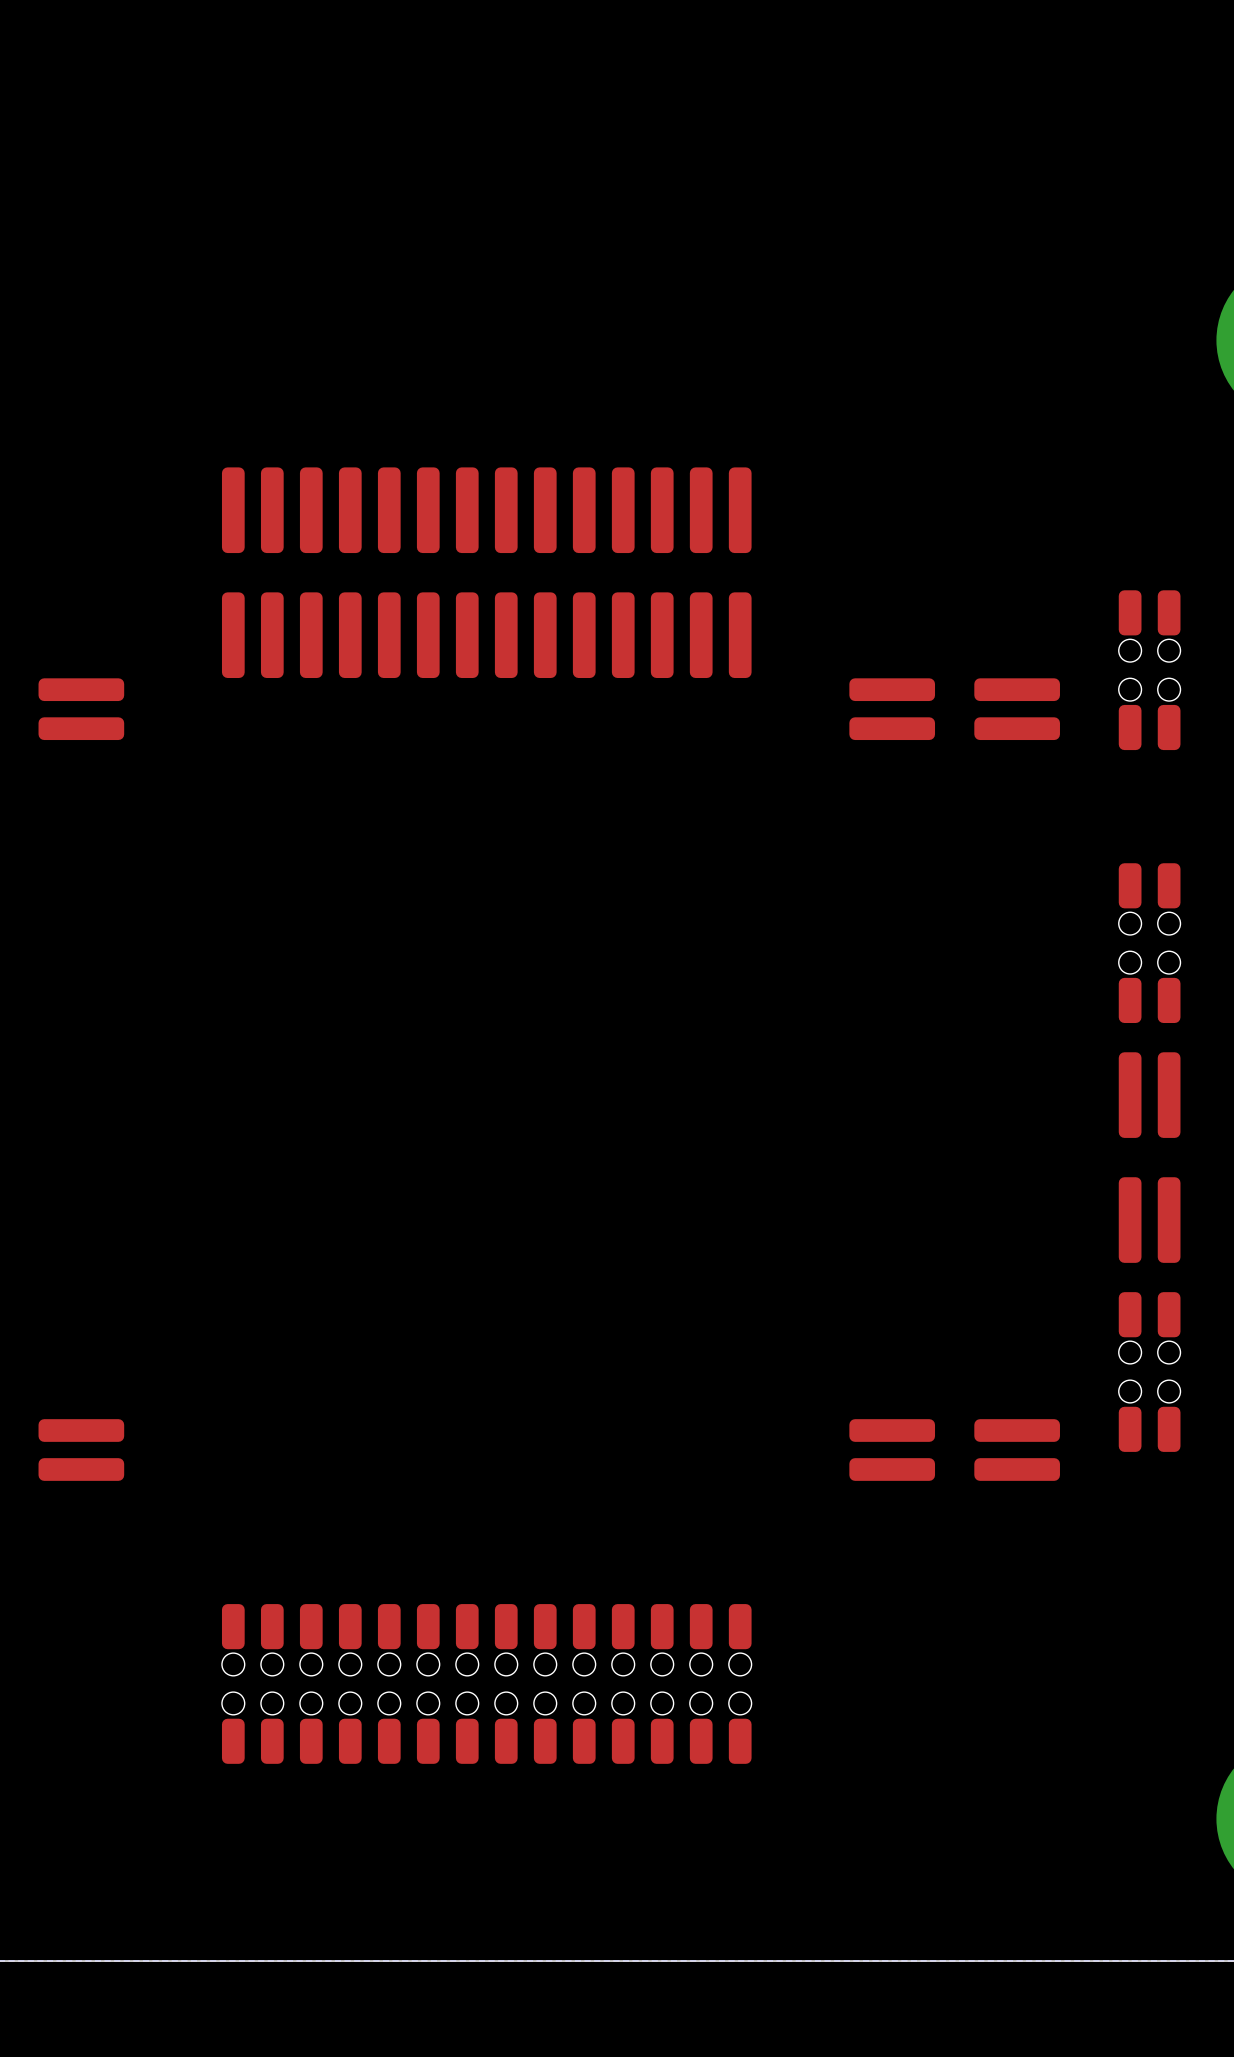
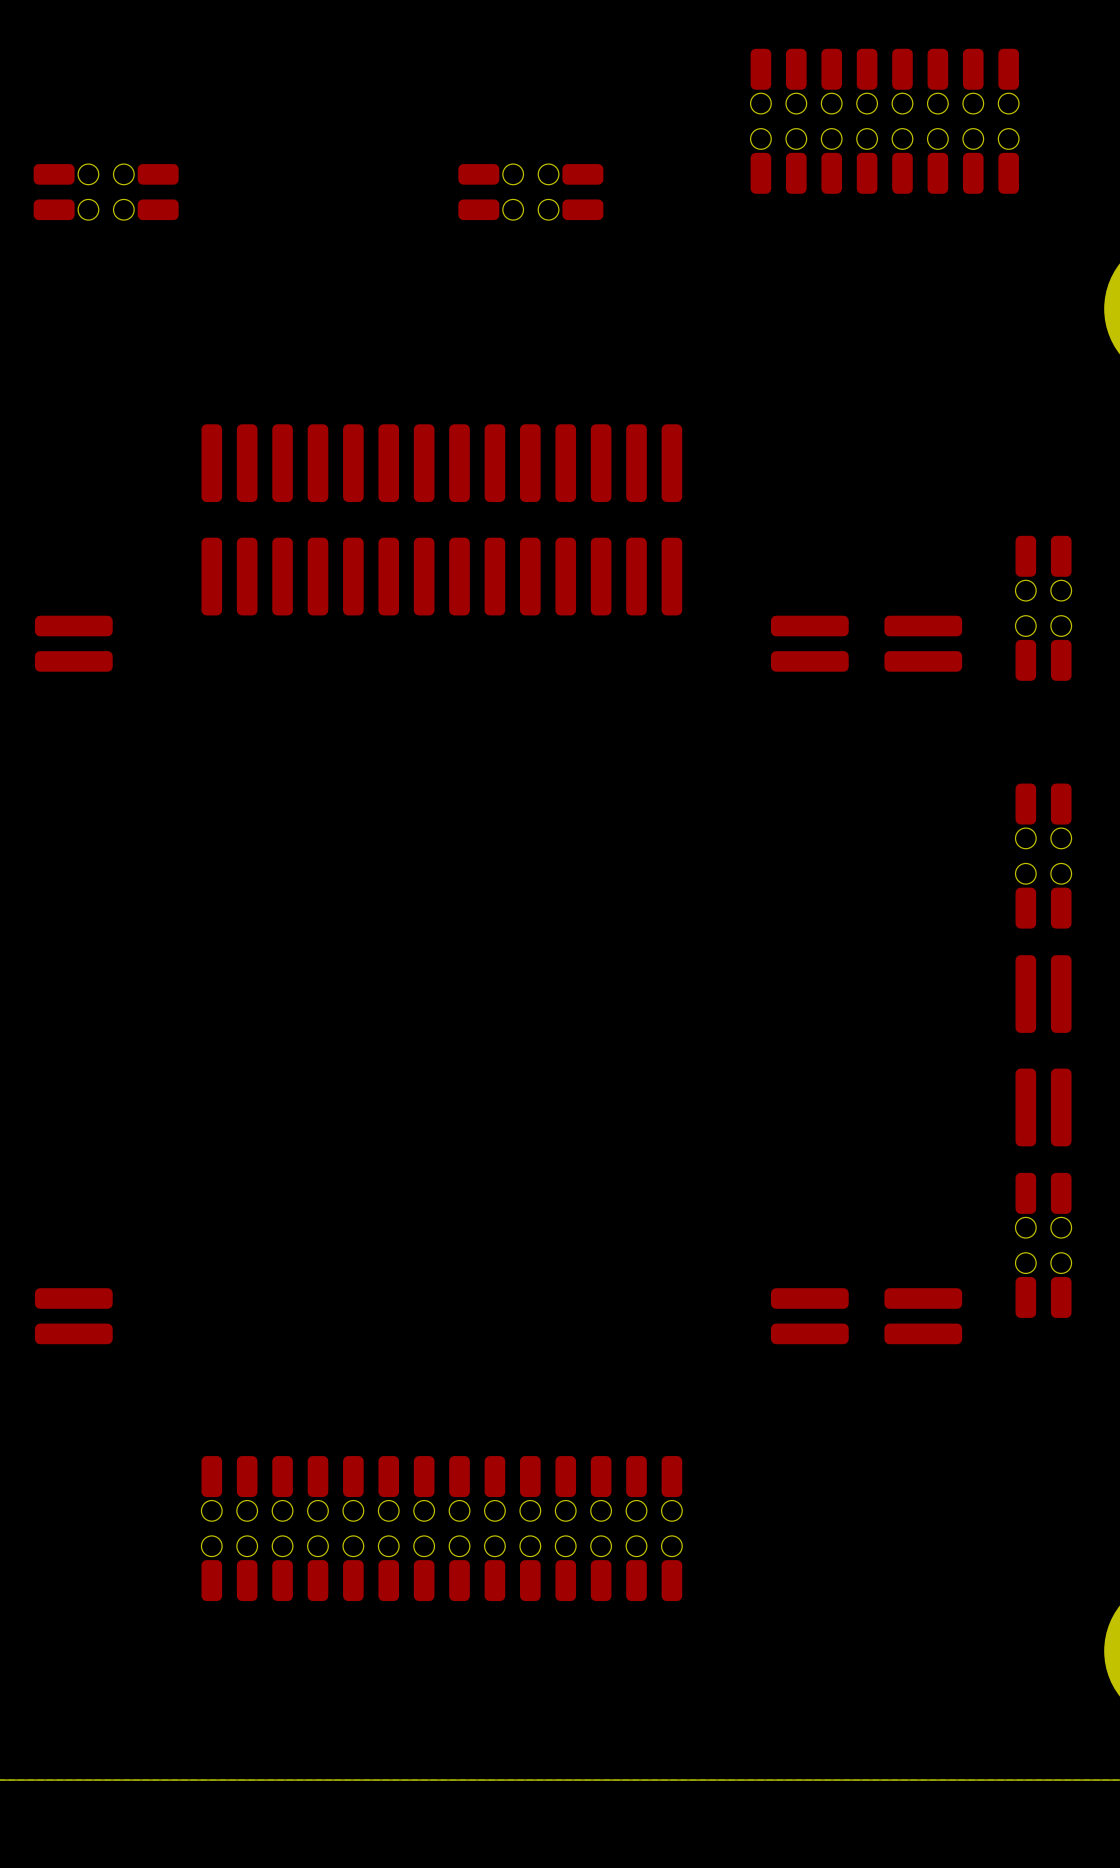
part: none -> (884, 121)
part: none -> (106, 192)
part: none -> (530, 192)

